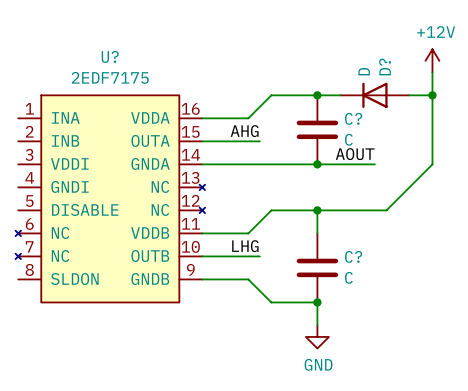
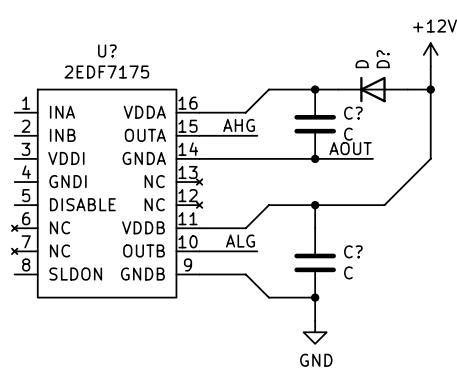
label: LHG (245, 246) -> ALG (240, 241)

